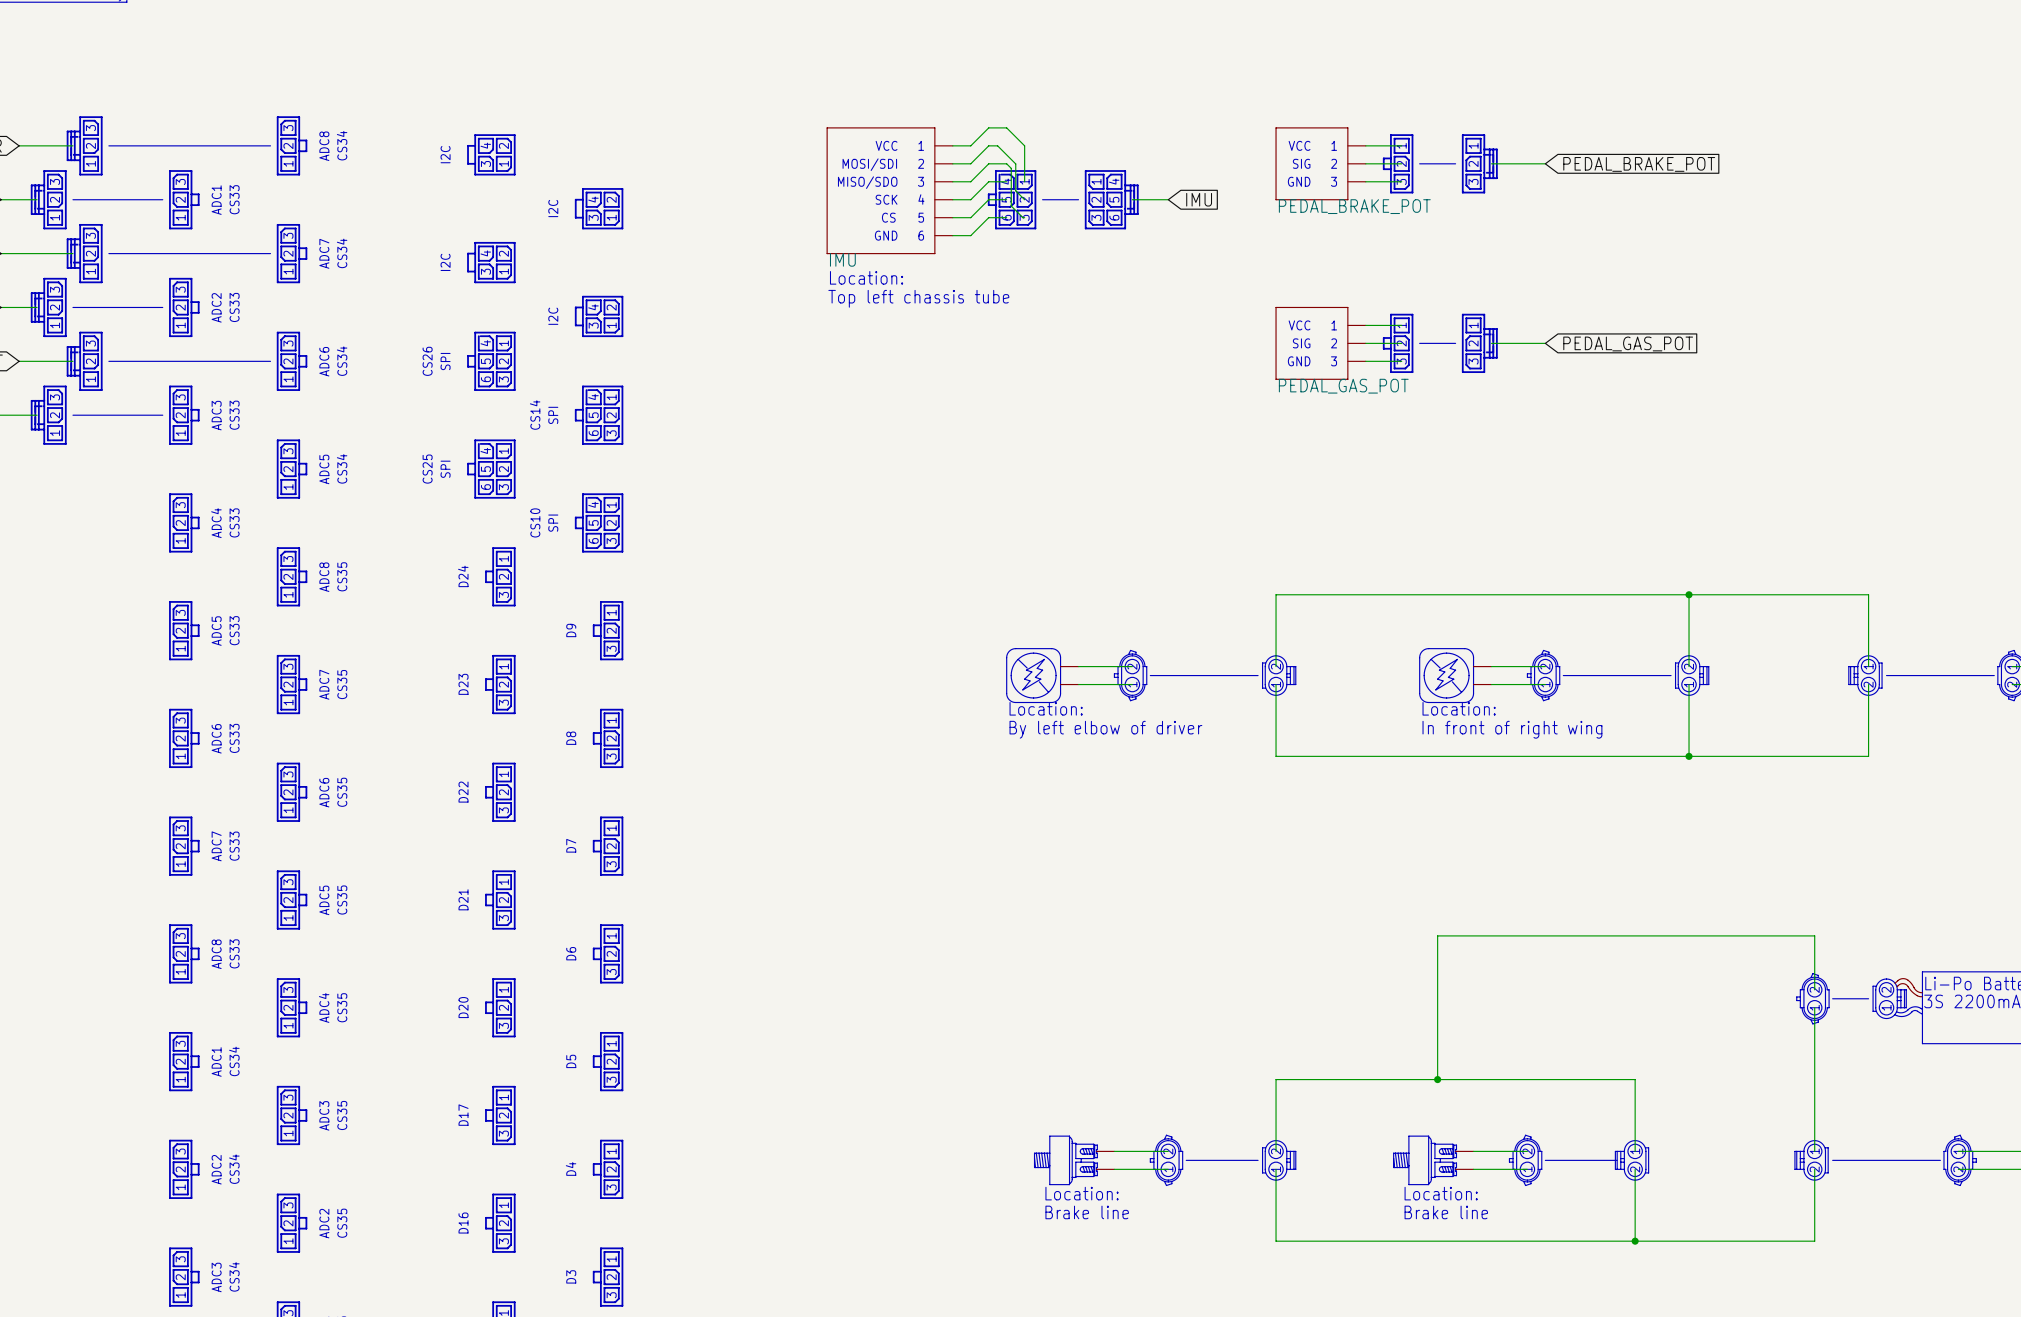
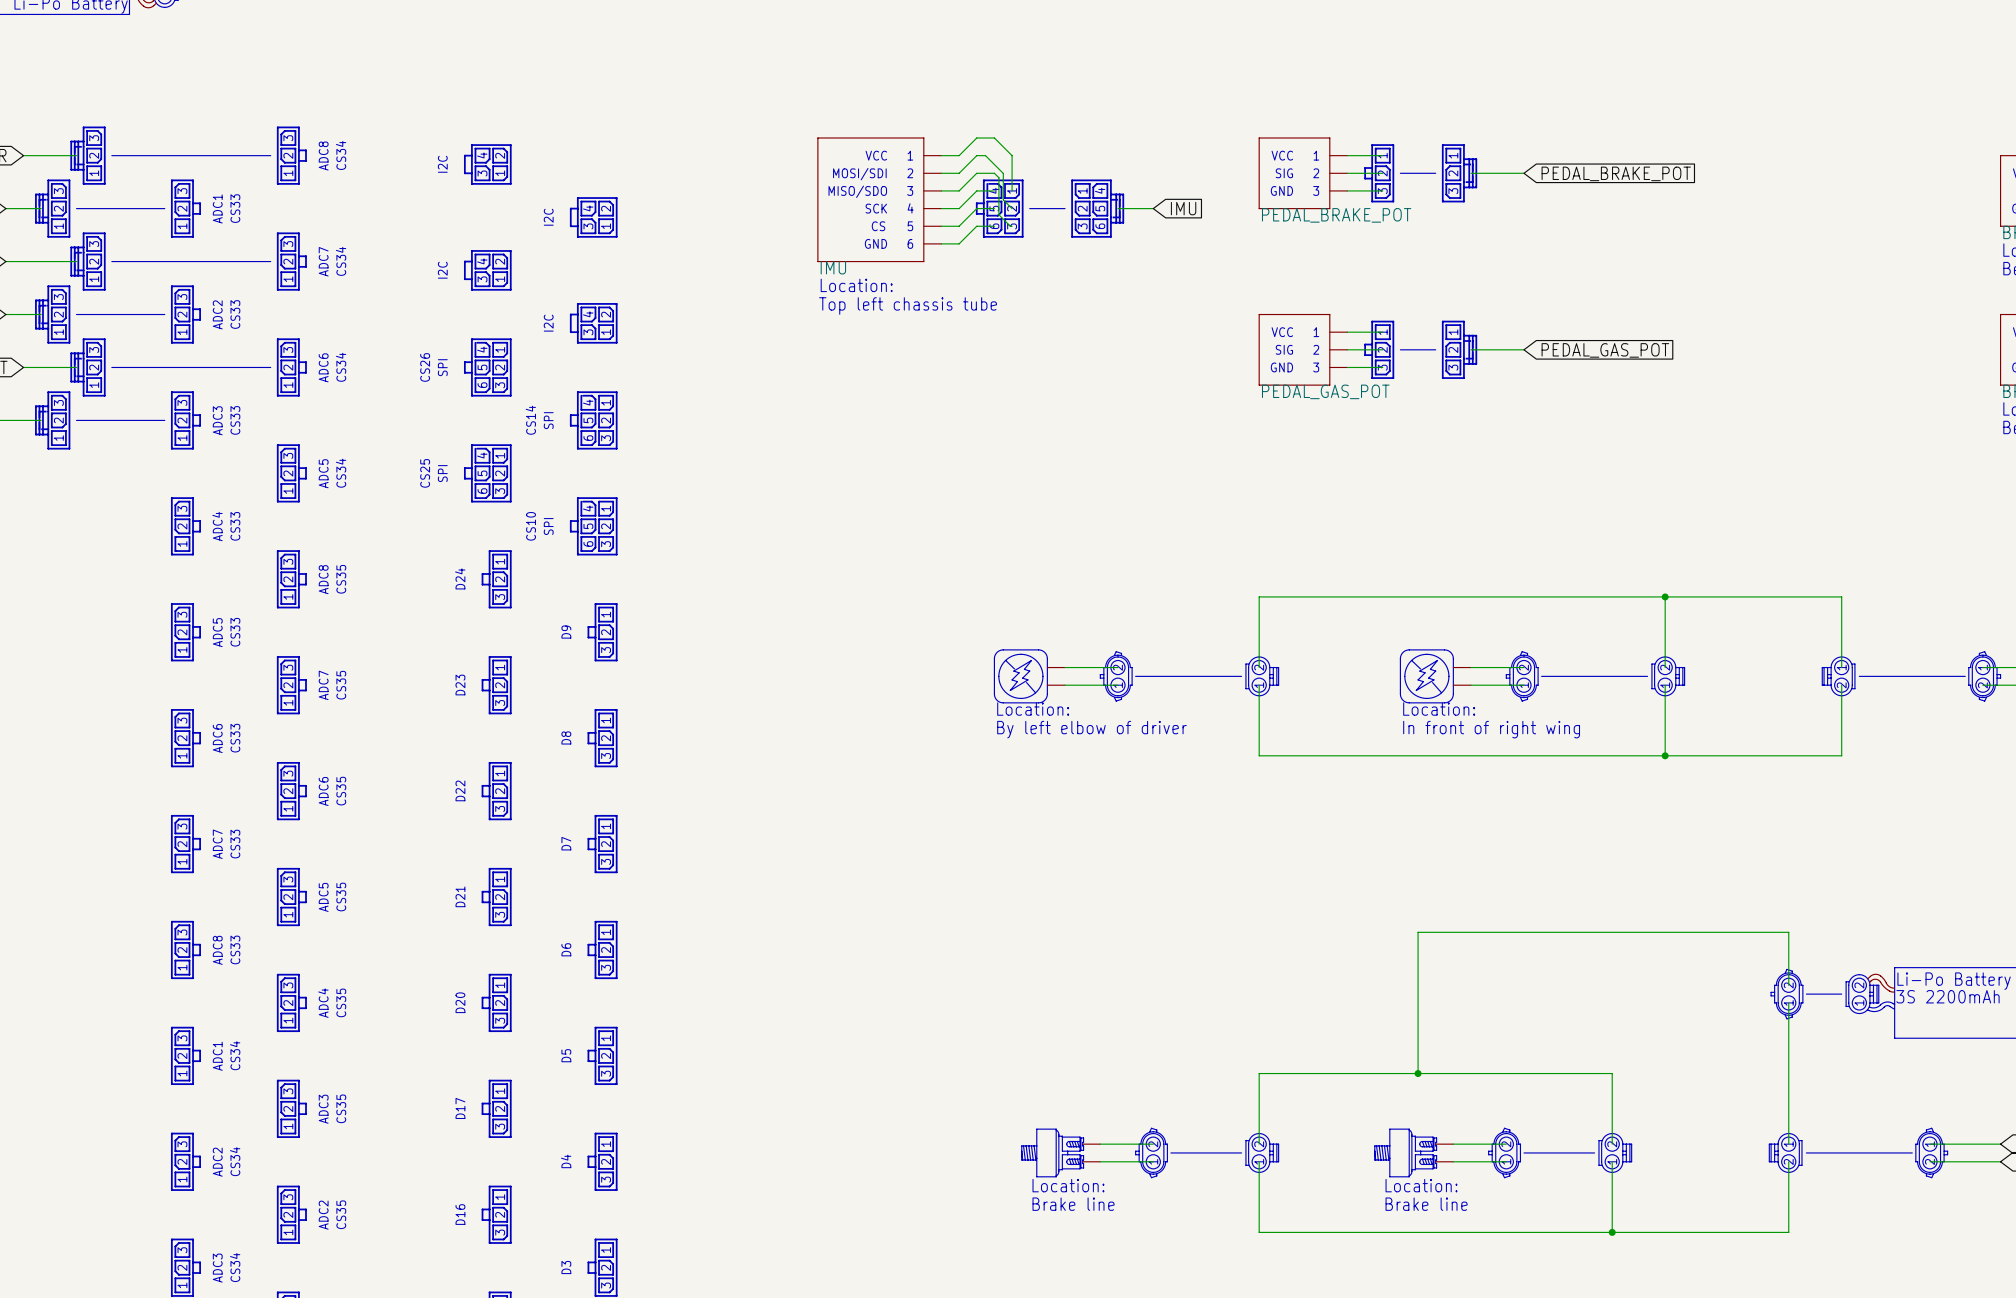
part symbol: [1614, 1140, 1650, 1181] -> [1598, 1133, 1633, 1173]

